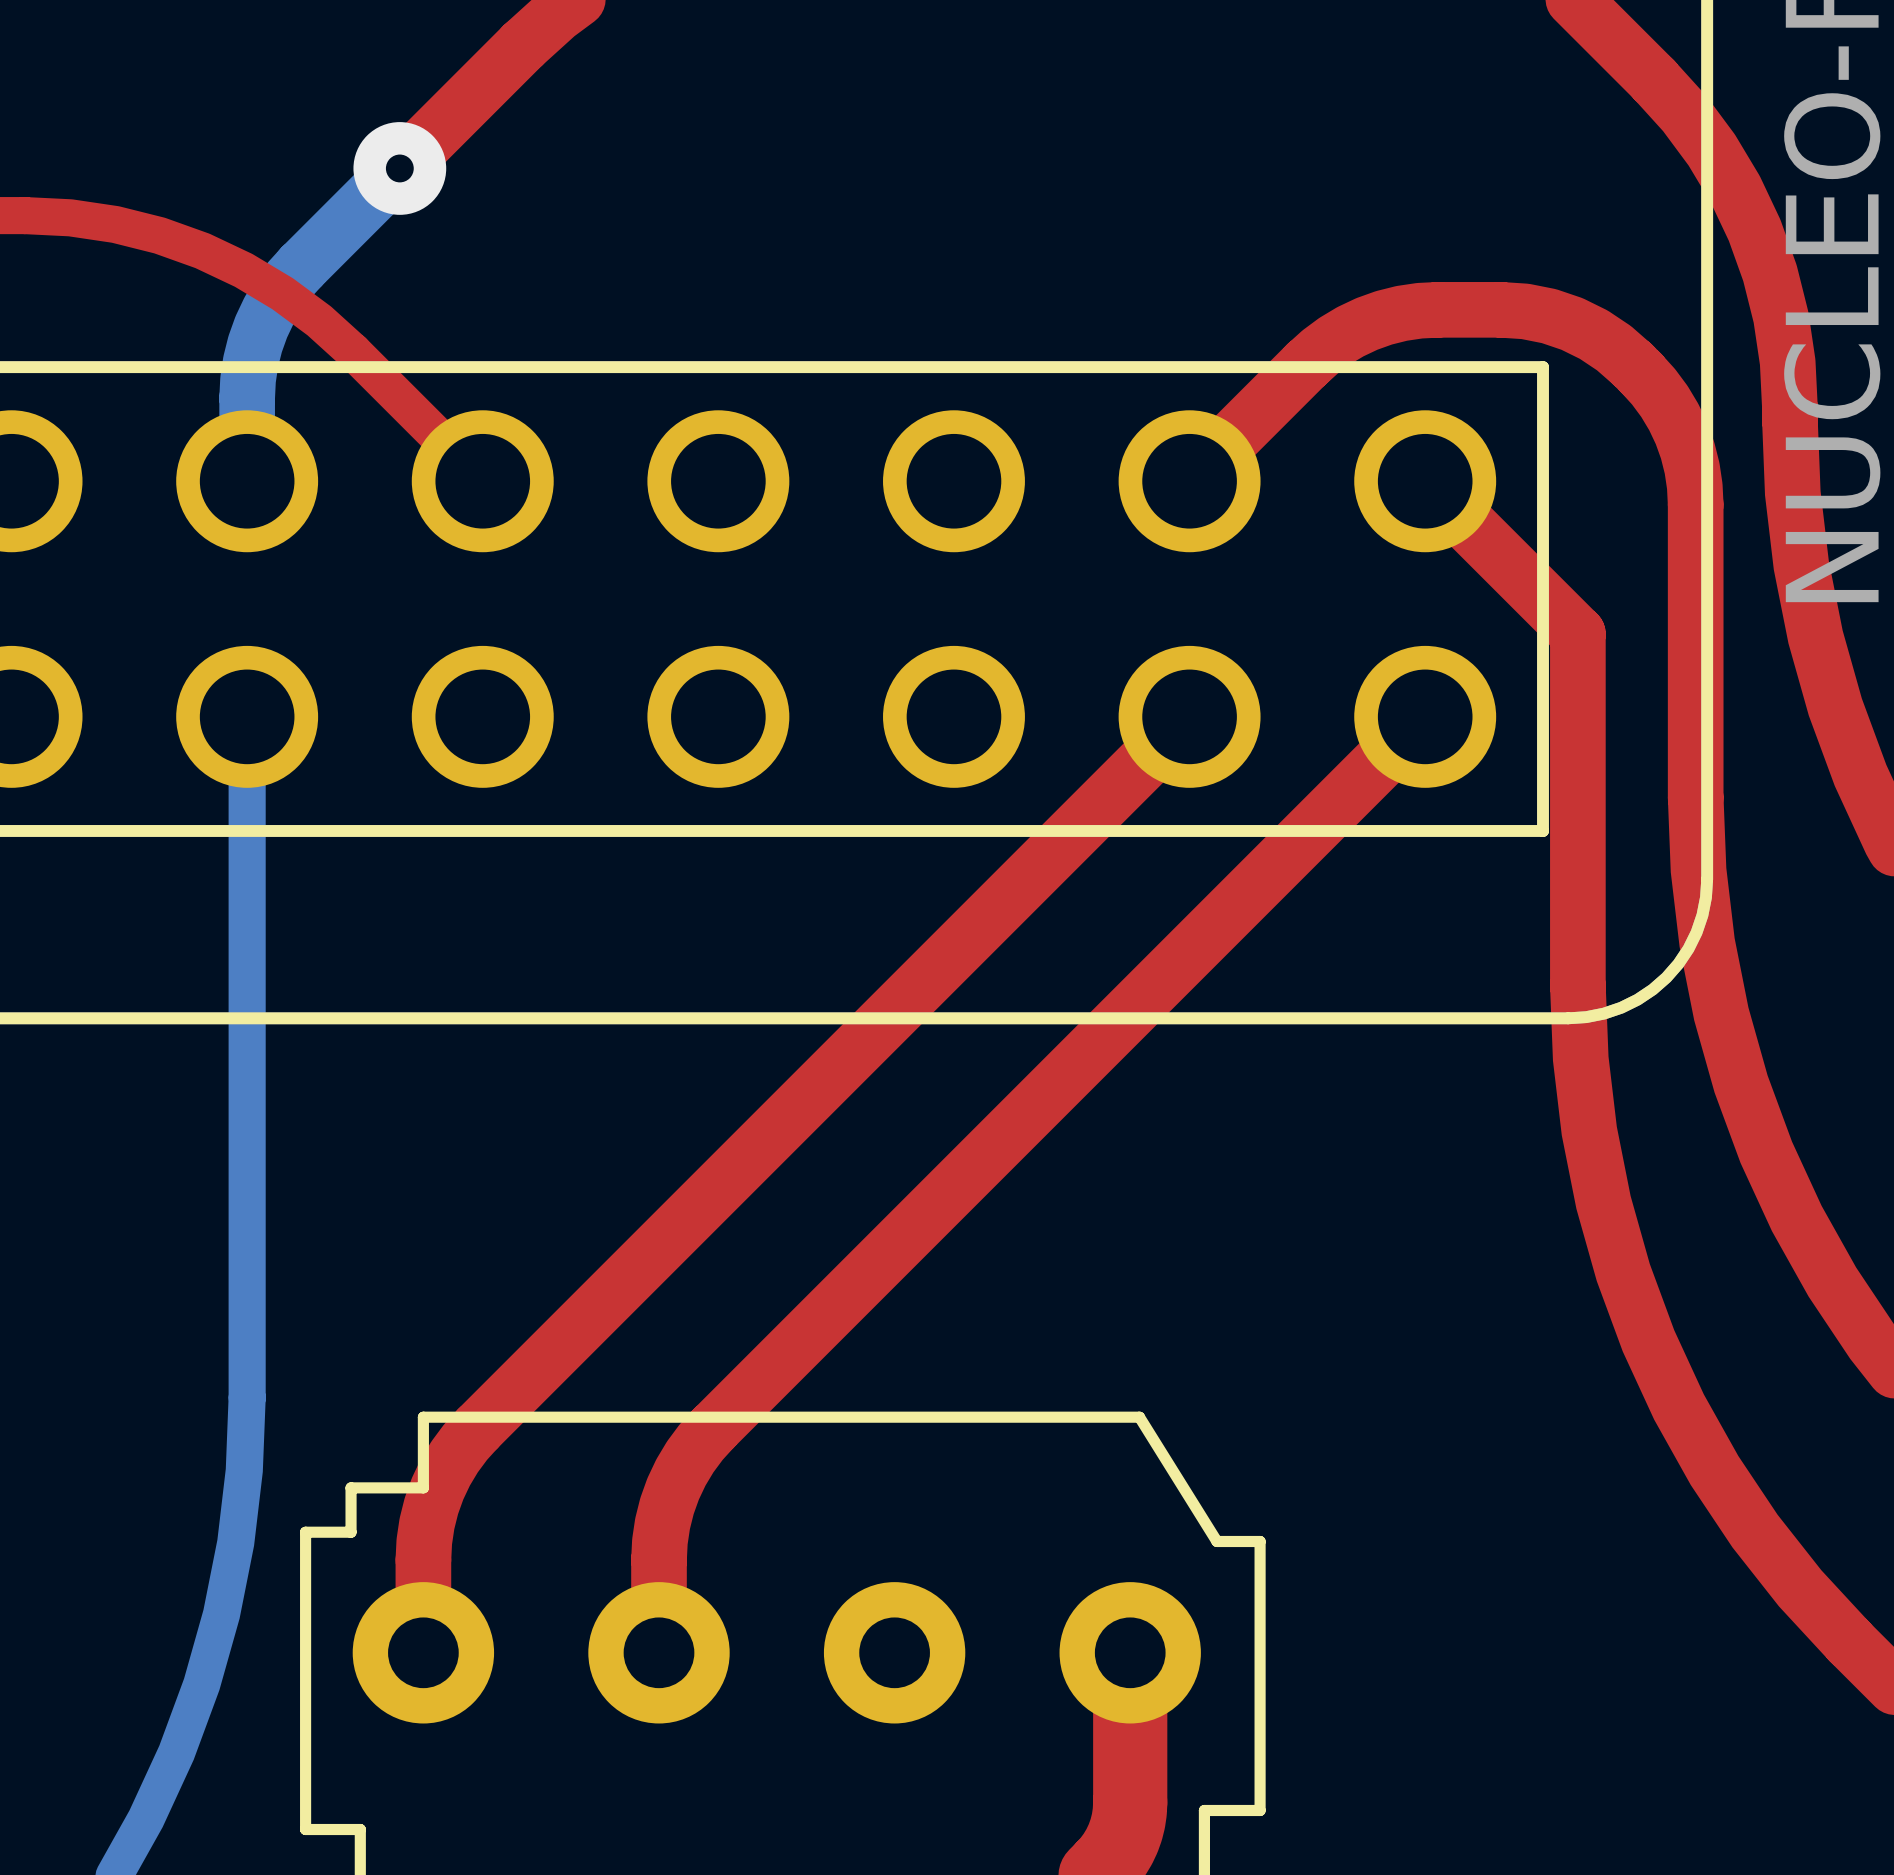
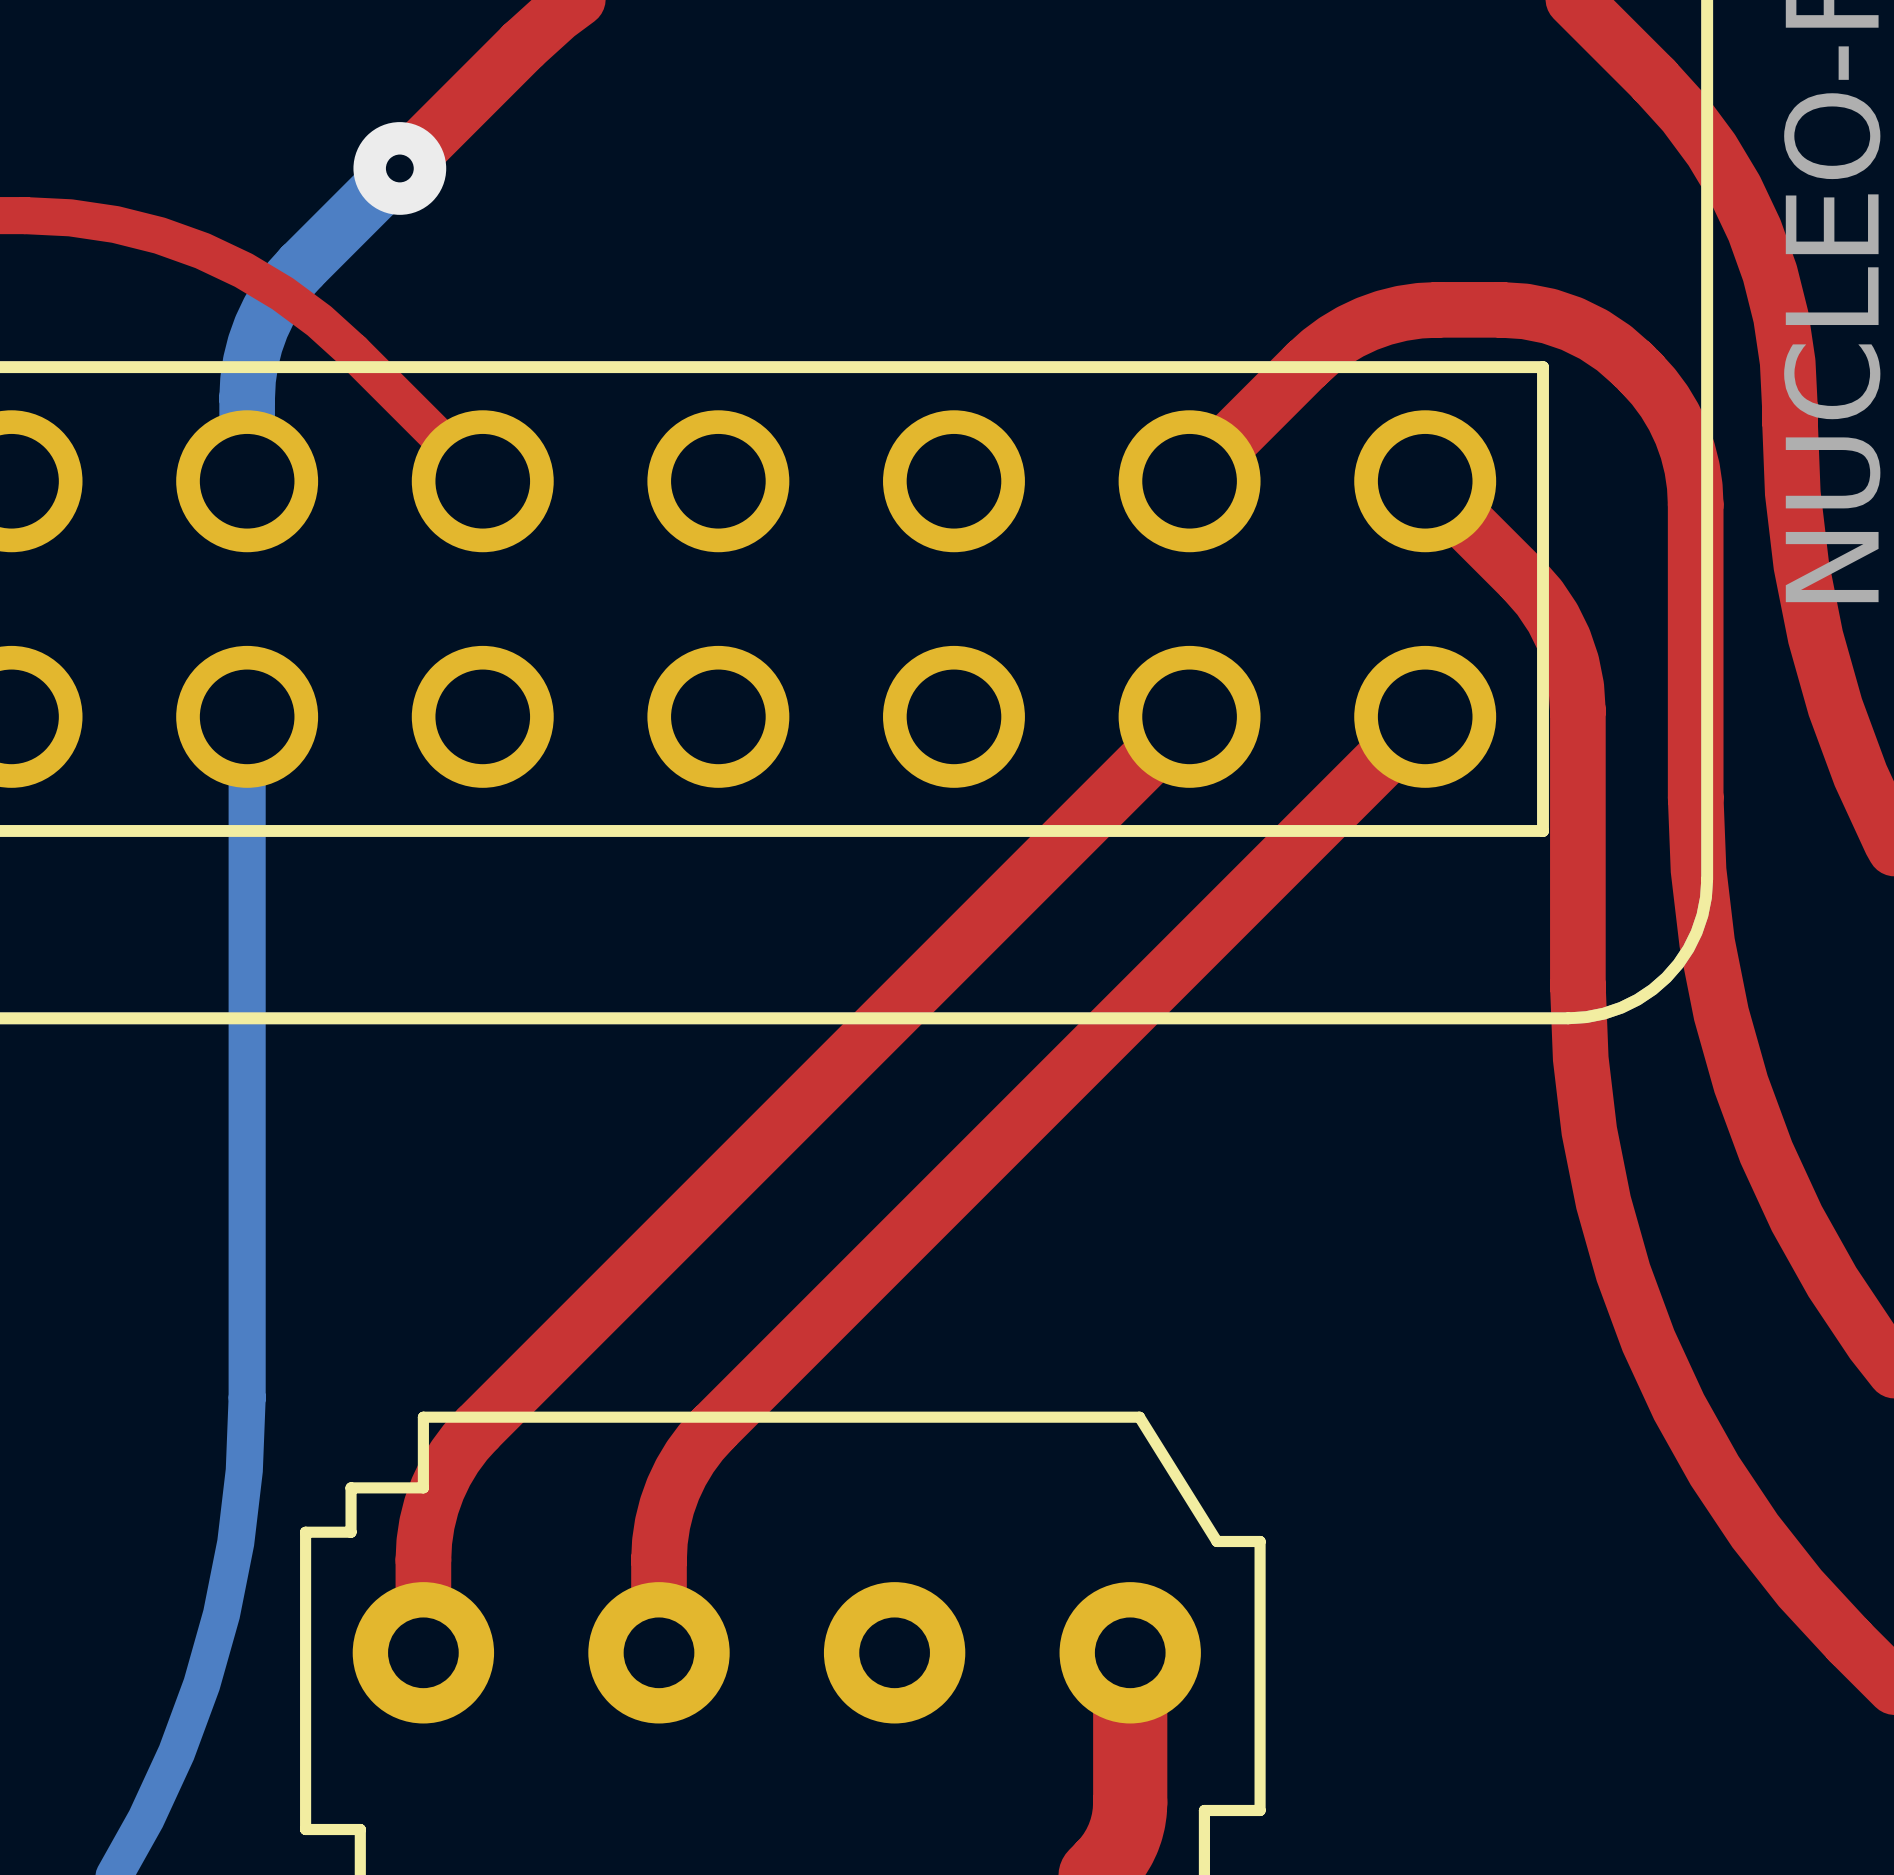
top track: (1523, 579) (1577, 633) (1577, 710) -> (1523, 579) (1539, 597) (1553, 618) (1563, 639) (1571, 662) (1576, 686) (1577, 710)

